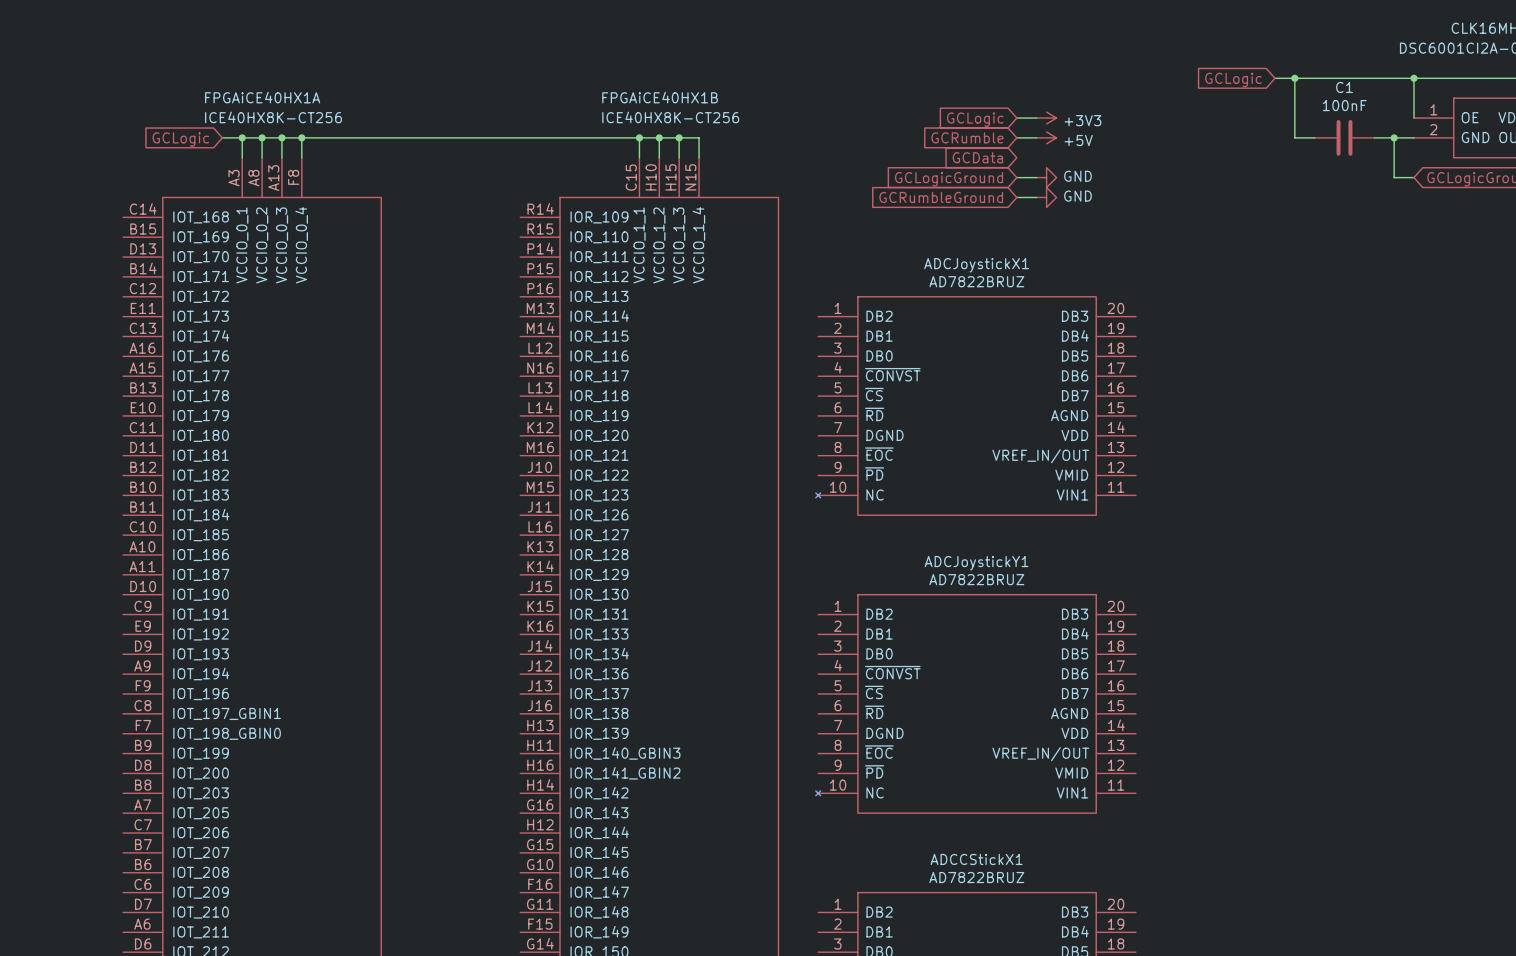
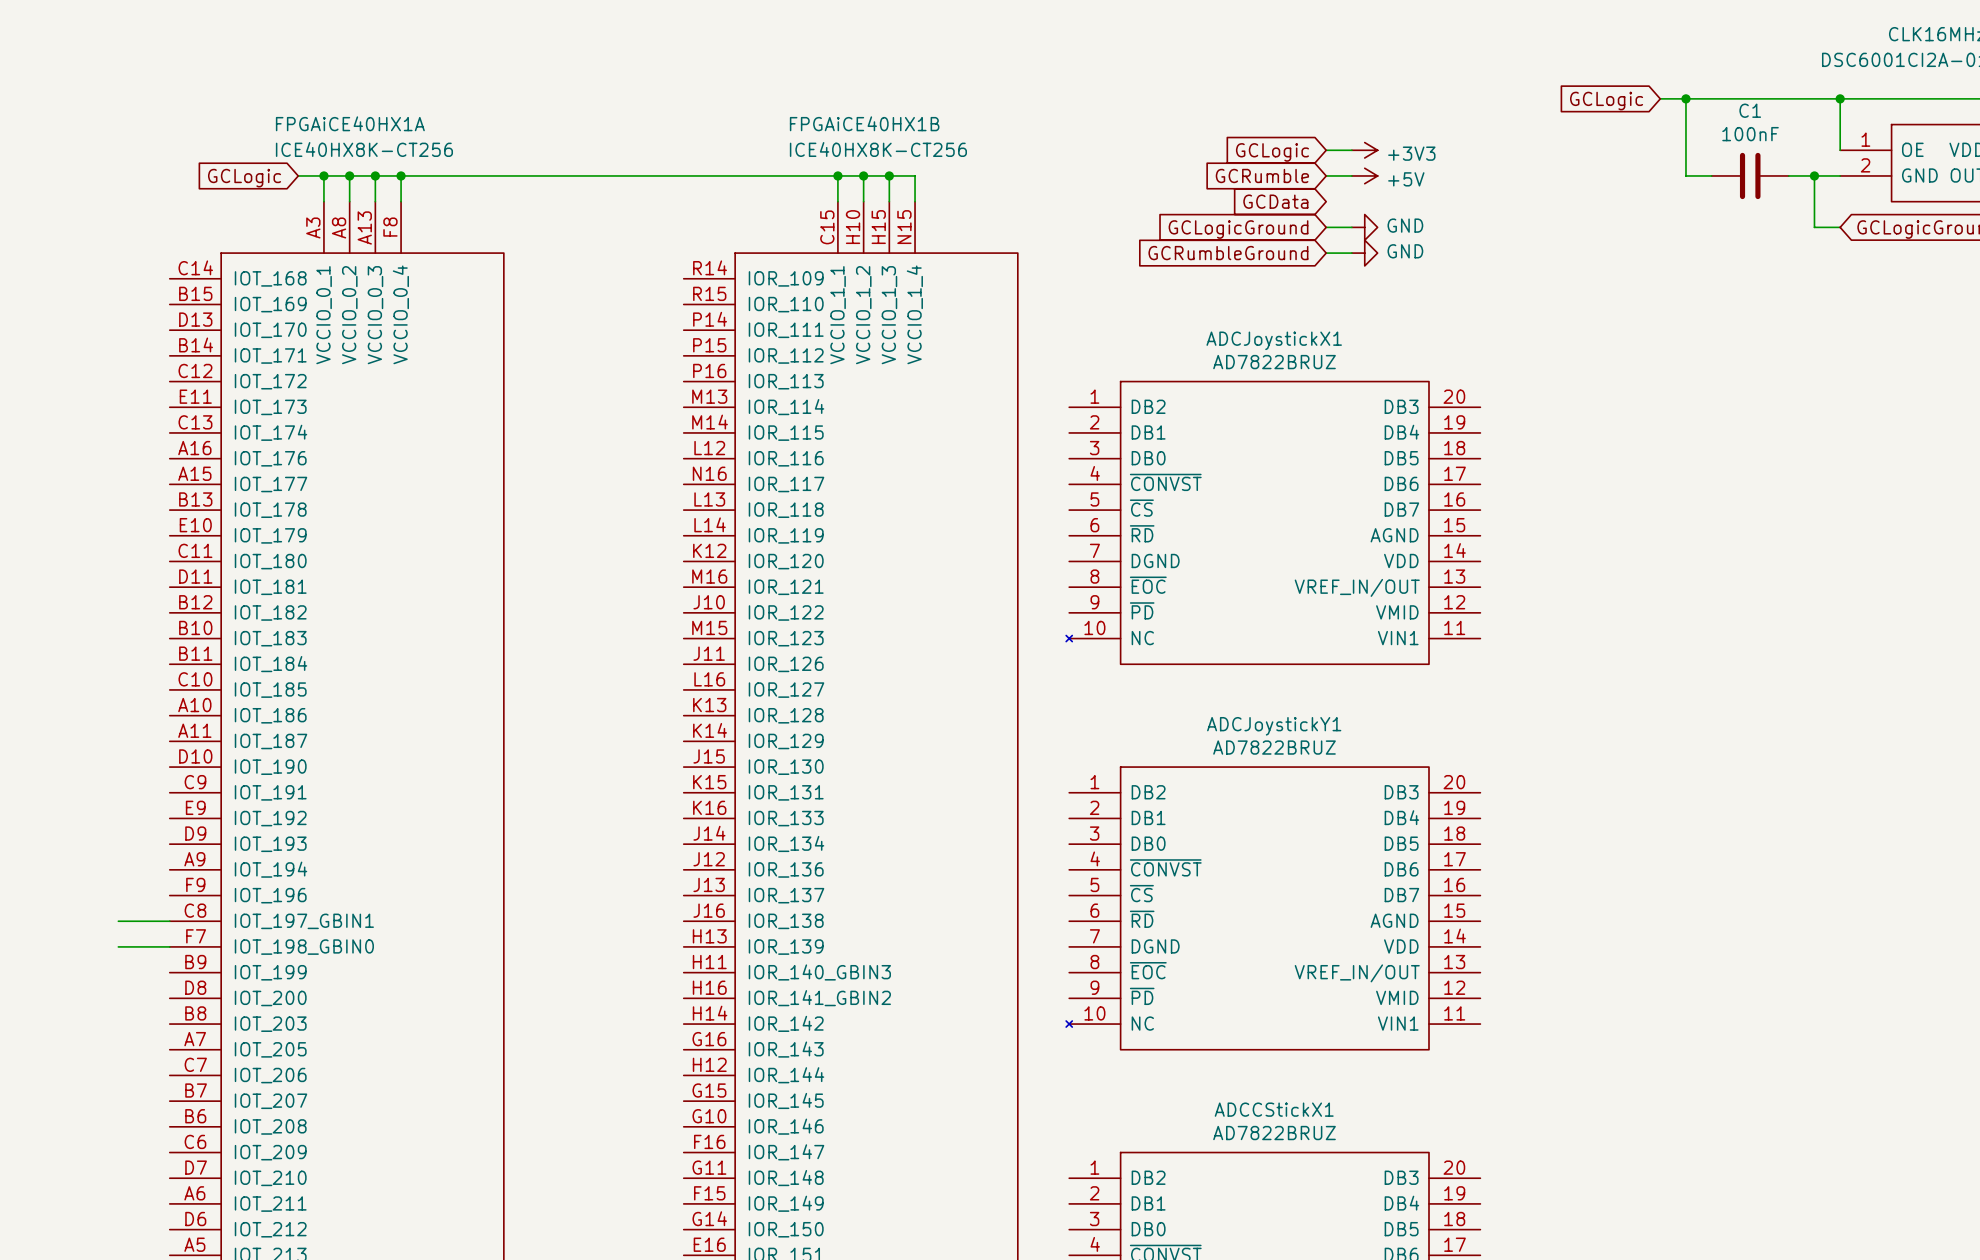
wire: none -> (118, 921) (169, 921)
wire: none -> (118, 946) (169, 946)

